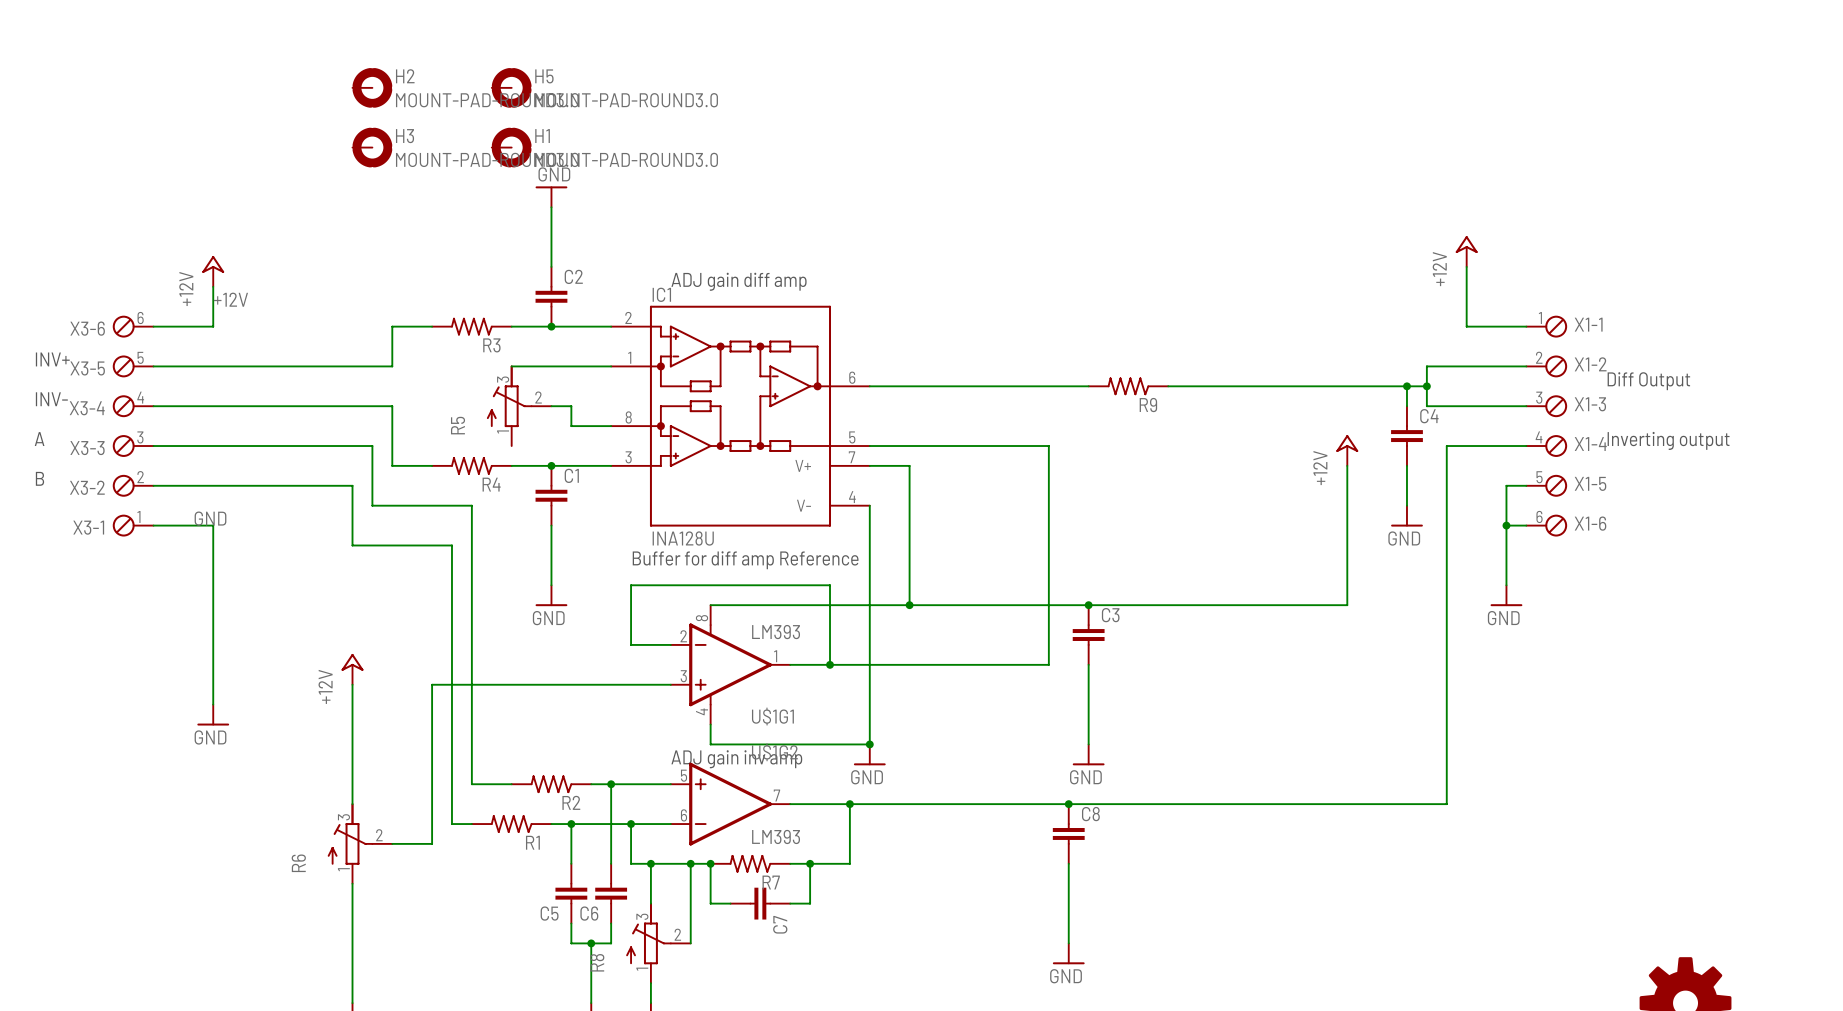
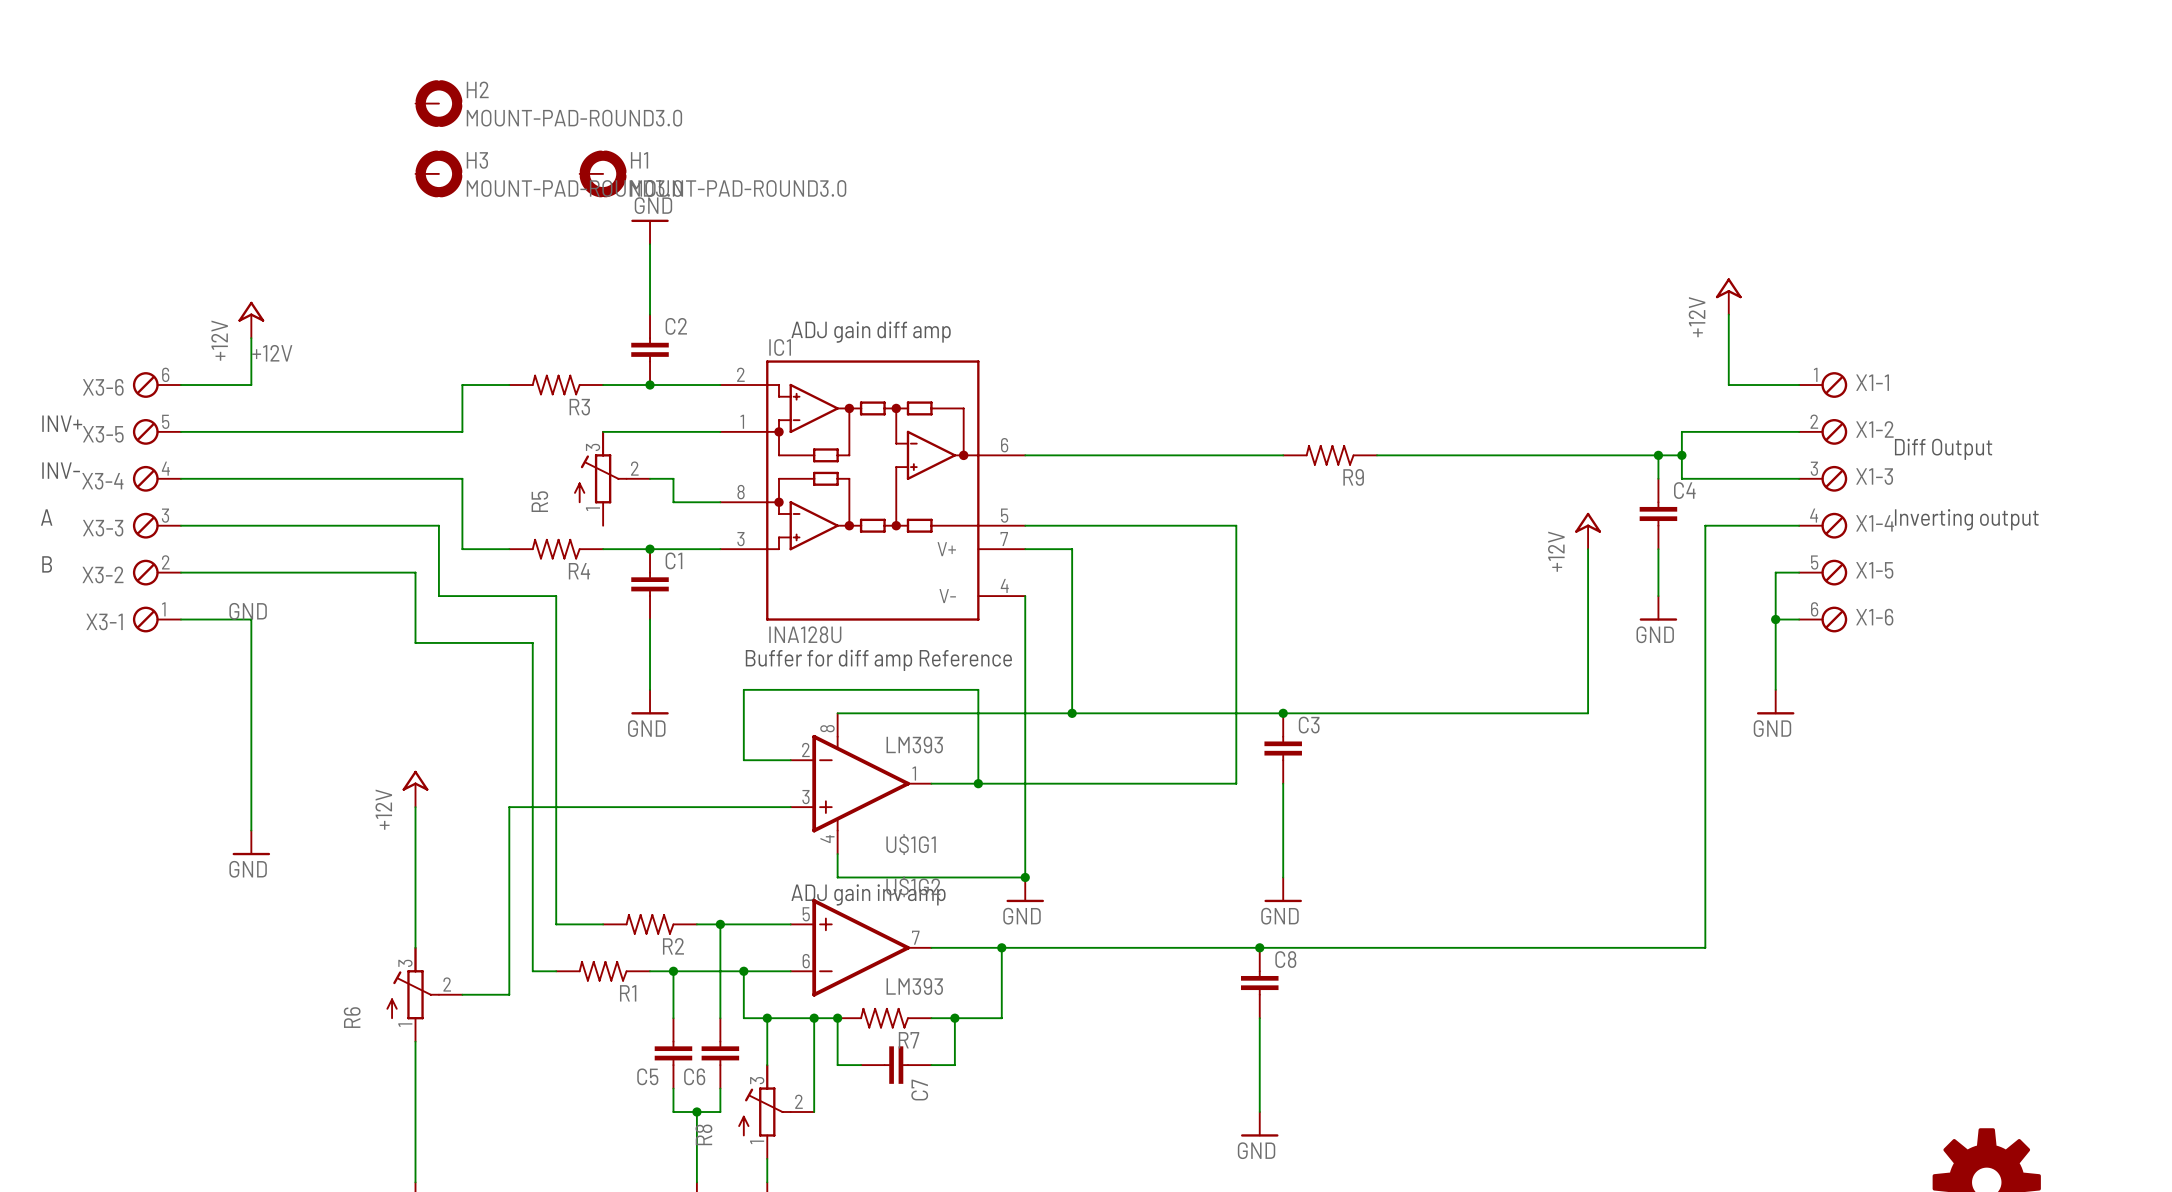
H5: MOUNT-PAD-ROUND3.0 (511, 87) -> none

